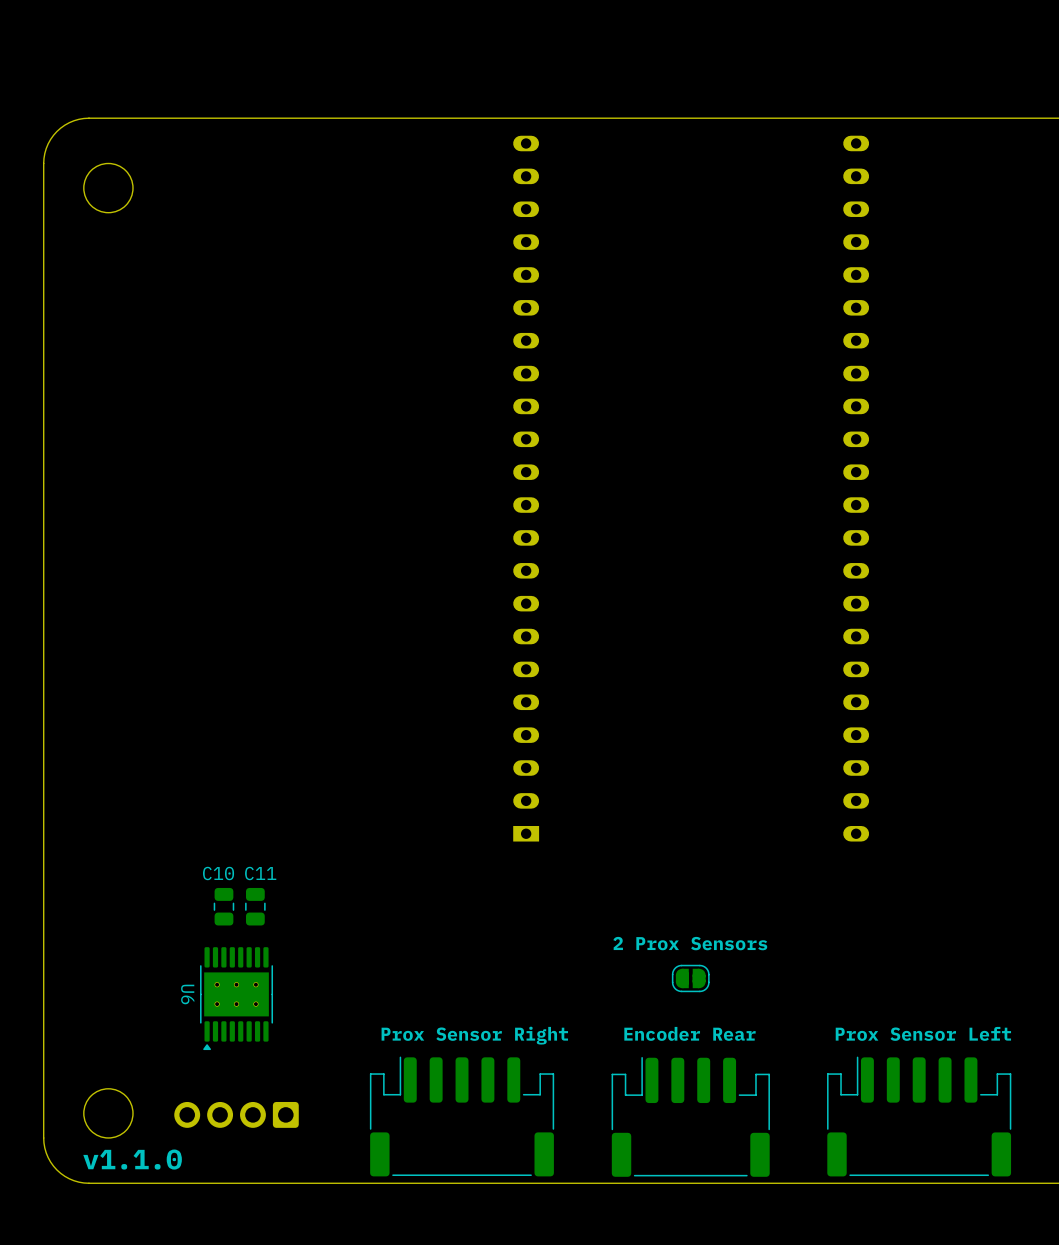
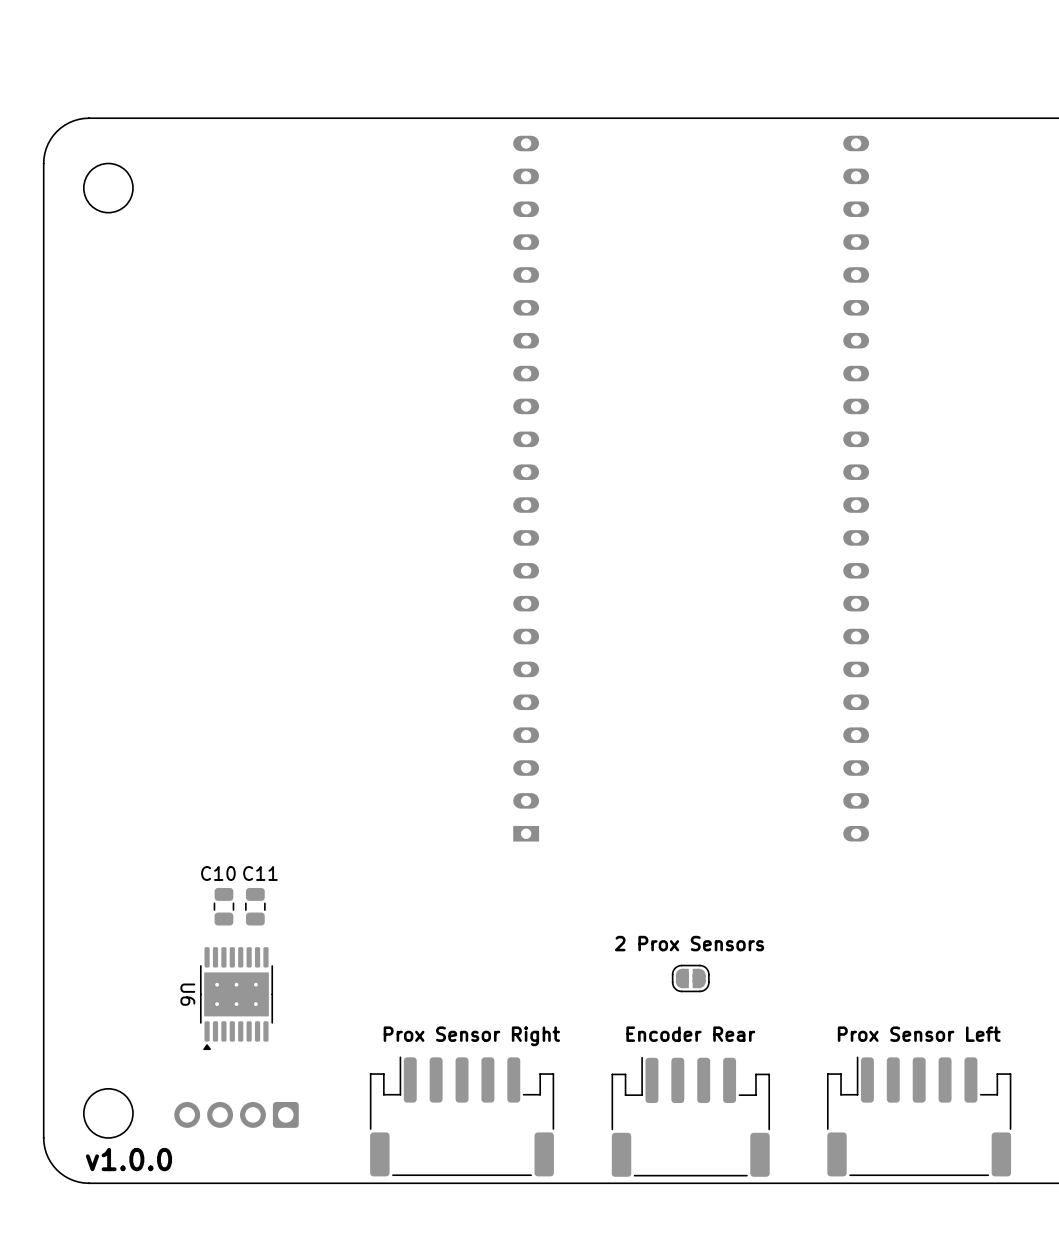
text: v1.1.0 (132, 1159) -> v1.0.0 (128, 1159)

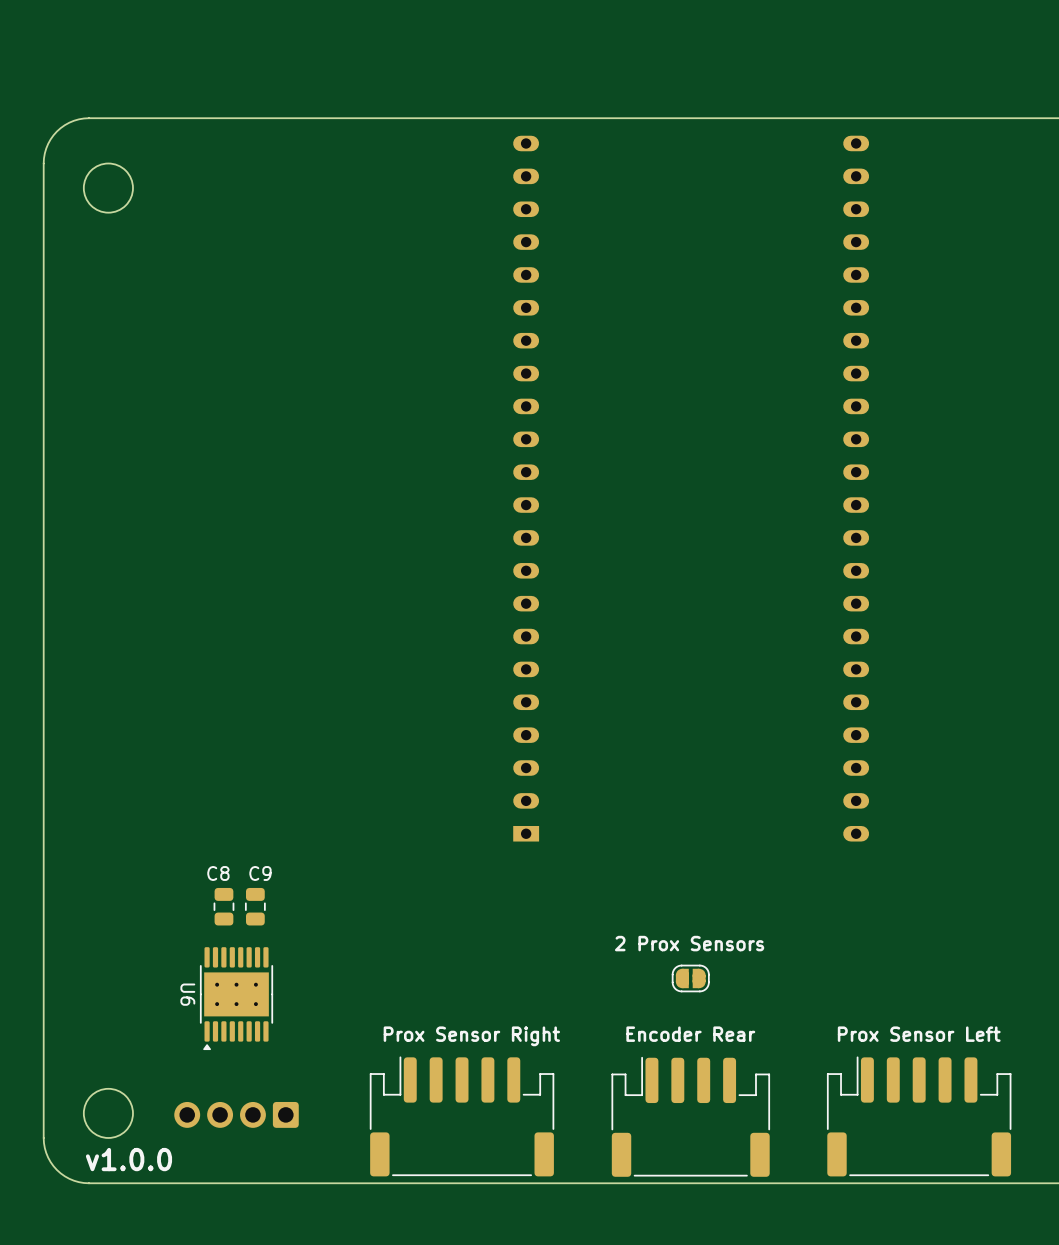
C10 name: C10 (218, 873) -> C8 (218, 873)
C11 name: C11 (260, 873) -> C9 (260, 873)

